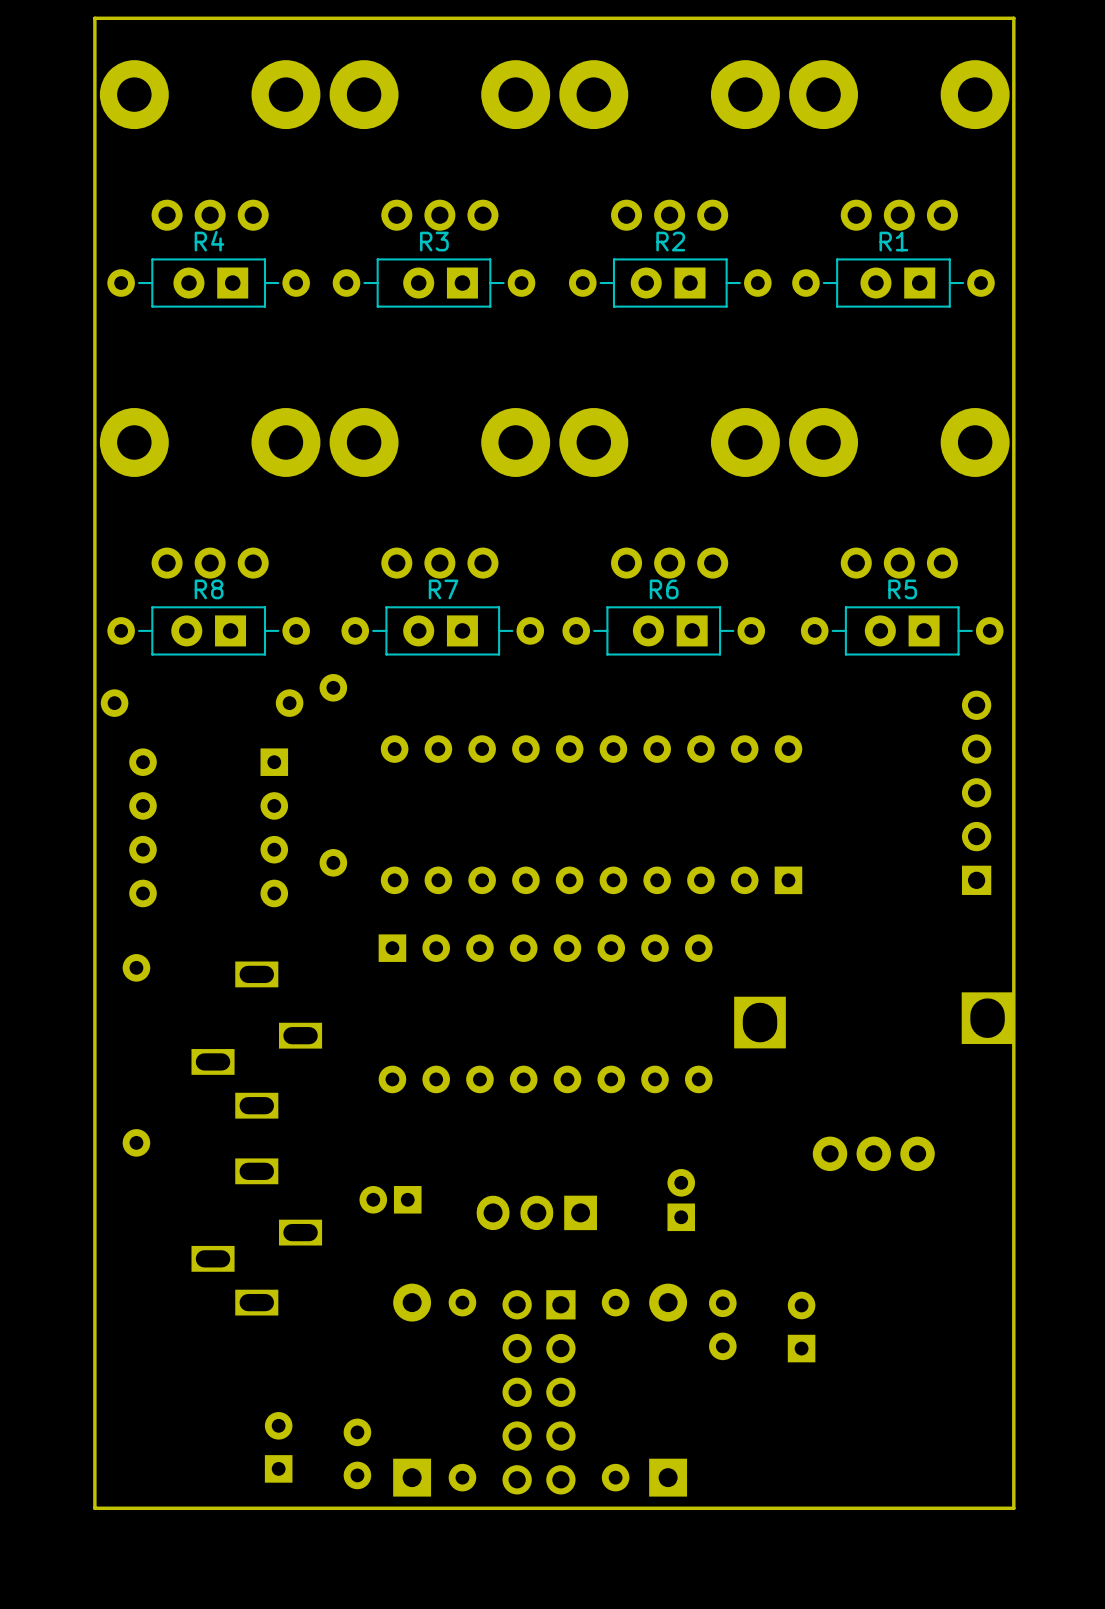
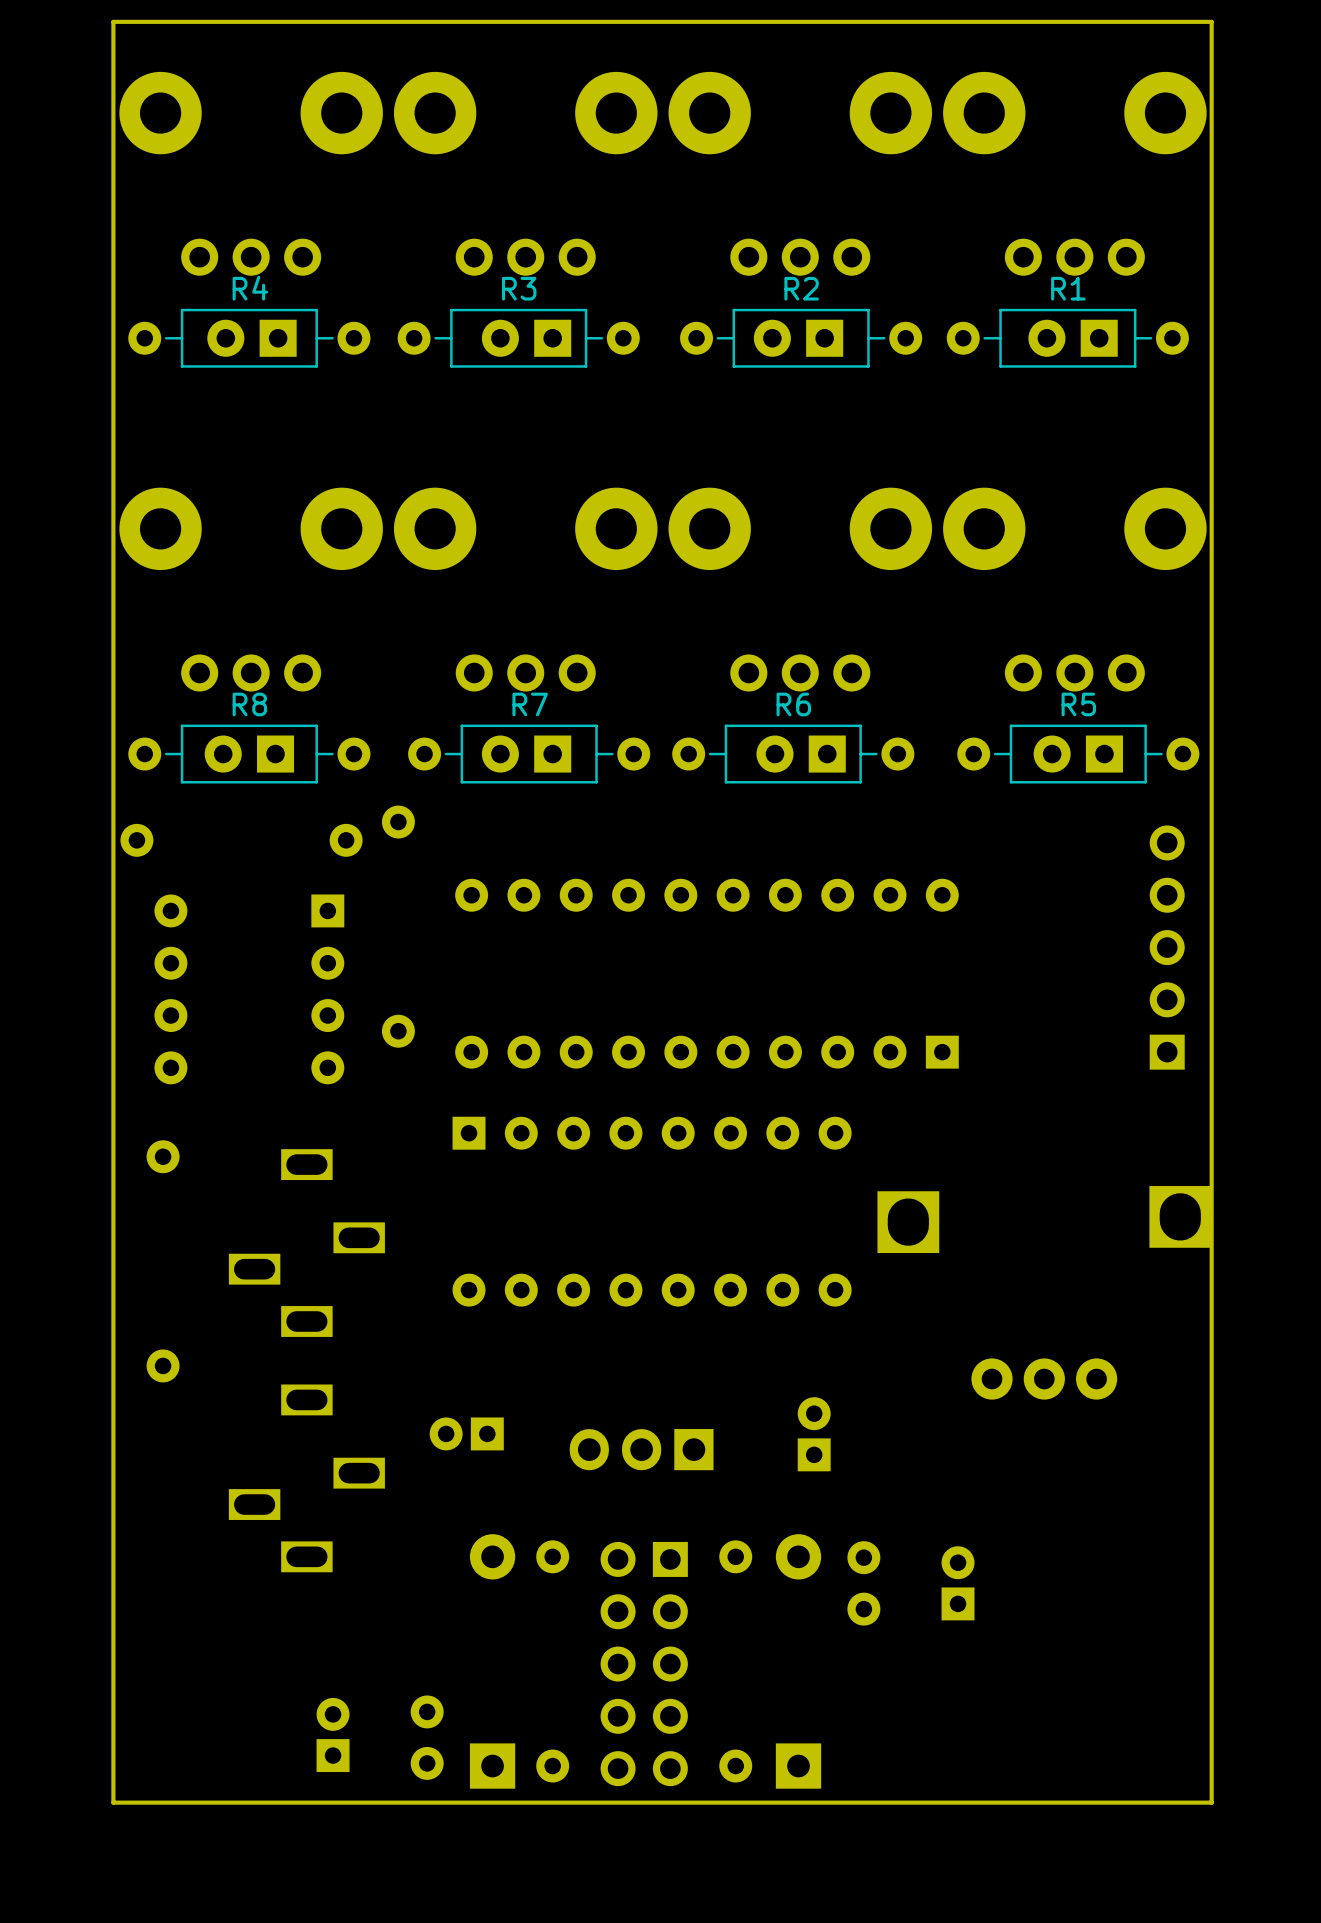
part footprint: [787, 1291, 816, 1363] -> [941, 1546, 975, 1621]
part footprint: [264, 1412, 293, 1483] -> [316, 1697, 350, 1773]

